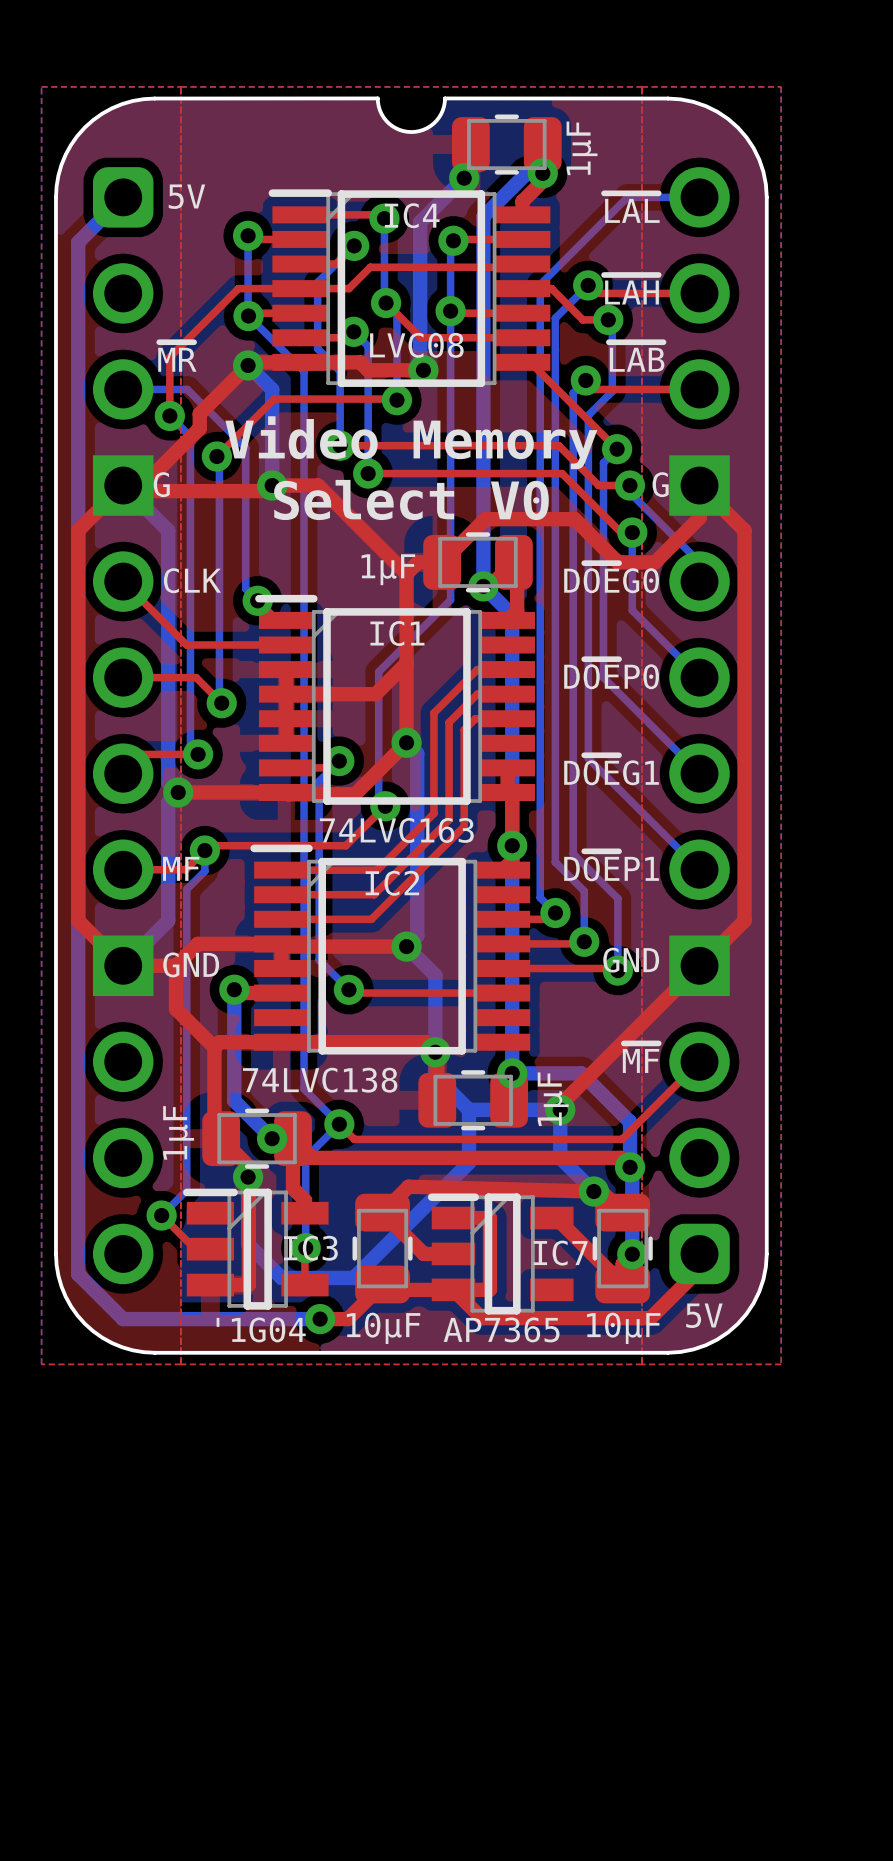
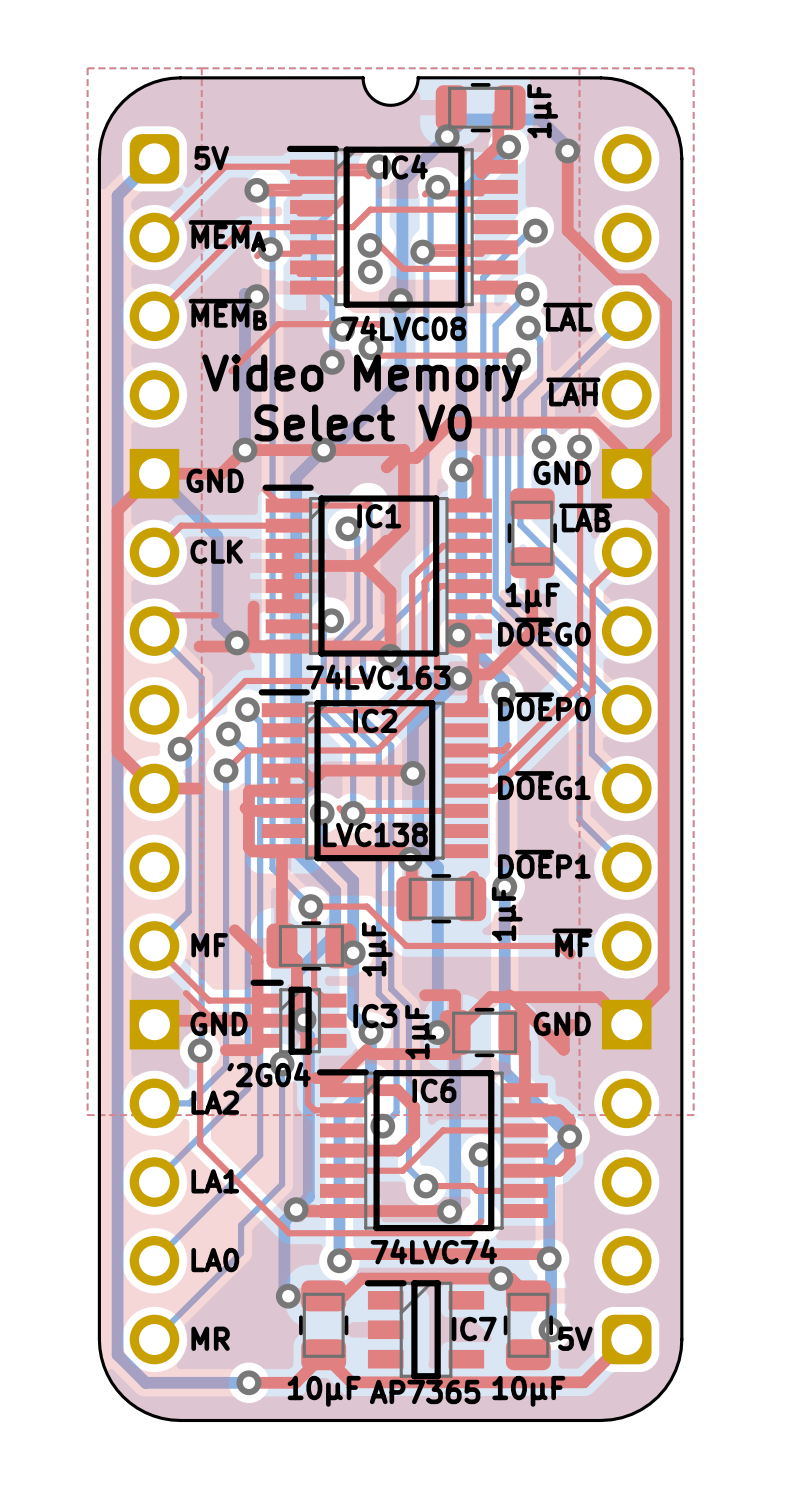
part position: (506, 144) -> (480, 107)
bottom track: (542, 173) (526, 173) (483, 216) (483, 586) (512, 615) (512, 1073) (581, 1073) (630, 1122) (632, 1254) -> none
via position: (542, 173) -> (508, 147)
bottom track: (464, 178) (420, 222) (420, 366) (423, 370) -> (288, 1296) (284, 1292) (284, 1221) (308, 1196) (308, 1035) (296, 1023) (296, 972) (335, 934) (335, 890) (296, 851) (296, 797) (312, 781) (296, 764) (296, 477) (323, 450) (331, 450) (400, 381) (400, 300)
via position: (464, 178) -> (447, 136)
bottom track: none -> (508, 147) (461, 194) (461, 632) (458, 635) (503, 680) (504, 1071) (569, 1136) (549, 1157) (551, 1329)
top track: none -> (567, 150) (567, 230) (616, 279) (642, 279) (666, 303) (666, 434) (626, 473) (663, 510)
bottom track: none -> (567, 150) (567, 147) (540, 119) (464, 119) (402, 181) (402, 294) (403, 295)
via: none -> (567, 150)
bottom track: (699, 197) (627, 197) (540, 284) (540, 897) (555, 912) -> none
top track: none -> (378, 166) (225, 166) (154, 237)
bottom track: none -> (378, 166) (378, 238) (375, 241)
text position: ~{LAL} (631, 208) -> ~{LAL} (567, 317)
bottom track: (384, 218) (384, 301) (396, 313) (396, 400) -> none
via position: (384, 218) -> (378, 166)
top track: none -> (312, 186) (268, 188)
bottom track: none -> (437, 187) (430, 194) (430, 247)
bottom track: none -> (268, 188) (272, 192) (272, 247) (270, 249) (272, 251) (272, 868) (310, 906)
bottom track: (248, 235) (248, 315) (304, 371) (304, 1089) (339, 1124) (305, 1157) (305, 1248) -> none
bottom track: (453, 240) (450, 243) (450, 599) (378, 671) (378, 799) (385, 806) -> none
via position: (453, 240) -> (437, 187)
via: (354, 245) -> none
top track: none -> (492, 209) (370, 209) (352, 227) (243, 227) (154, 316)
top track: (519, 267) (370, 267) (348, 288) (238, 288) (169, 357) (169, 415) -> none
bottom track: none -> (533, 227) (483, 277) (483, 601) (579, 698) (579, 820) (626, 867)
top track: (588, 285) (596, 293) (699, 293) -> none
bottom track: (588, 285) (555, 318) (555, 862) (584, 891) (584, 941) -> none
IC4 position: (409, 288) -> (402, 226)
top track: (522, 288) (551, 288) (582, 319) (608, 319) -> none
text: ~{LAH} (631, 289) -> none
text: none -> ~{MEM}A (227, 236)
top track: none -> (375, 241) (403, 268) (493, 268)
top track: (386, 303) (420, 337) (522, 337) -> none
top track: none -> (430, 247) (495, 247)
bottom track: none -> (422, 252) (426, 255) (426, 589) (363, 653) (363, 673) (370, 680)
via position: (248, 316) -> (270, 249)
bottom track: (608, 319) (612, 323) (612, 391) (588, 415) (588, 758) -> (518, 360) (508, 370) (508, 591) (535, 618)
via: (608, 319) -> none
bottom track: (353, 331) (368, 346) (368, 473) -> none
via: (353, 331) -> none
via: none -> (370, 272)
IC4 text: LVC08 (416, 345) -> none
text: ~{MR} (177, 357) -> ~{MEM}B (227, 314)
text position: ~{LAB} (636, 357) -> ~{LAB} (585, 517)
bottom track: none -> (245, 294) (245, 450)
top track: (530, 362) (617, 449) -> none
bottom track: none -> (527, 294) (495, 325) (495, 596) (591, 692) (591, 753) (626, 788)
via: none -> (527, 294)
bottom track: (248, 365) (272, 389) (272, 485) -> none
top track: (423, 370) (368, 370) (360, 362) (251, 362) (199, 413) (199, 428) (142, 485) -> none
top track: (585, 380) (594, 389) (699, 389) -> none
bottom track: (585, 380) (573, 393) (573, 853) (617, 898) (617, 970) -> none
via: (585, 380) -> none
bottom track: (123, 389) (187, 389) (245, 447) (245, 588) (257, 600) -> none
bottom track: none -> (626, 316) (544, 398) (544, 447)
via position: (396, 400) -> (370, 347)
via: none -> (528, 328)
IC4 text: none -> 74LVC08 (403, 328)
via: none -> (342, 329)
bottom track: (169, 415) (190, 436) (190, 746) (198, 754) -> none
via: (169, 415) -> none
top track: none -> (370, 347) (378, 355) (514, 355) (518, 360)
text position: Video Memory (411, 442) -> Video Memory (362, 378)
via: none -> (518, 360)
top track: (340, 445) (558, 445) (598, 485) (629, 485) -> none
bottom track: (617, 449) (603, 462) (603, 677) -> (528, 328) (540, 339) (540, 379) (520, 398) (520, 524) (548, 552)
via: (617, 449) -> none
bottom track: (216, 456) (219, 459) (219, 700) (221, 703) -> none
via: (216, 456) -> none
top track: (368, 473) (562, 473) (621, 532) (632, 532) -> none
via: (368, 473) -> none
text: G (161, 484) -> none
text: G (660, 484) -> ~{LAH} (573, 391)
top track: (123, 485) (78, 530) (78, 626) -> none
bottom track: (123, 485) (168, 530) (168, 782) (178, 792) (168, 802) (168, 920) (123, 965) -> none
via: (272, 485) -> none
bottom track: (629, 485) (629, 492) (699, 562) -> none
via: (629, 485) -> none
top track: (128, 491) (266, 491) (272, 485) (318, 485) (406, 573) (406, 742) (355, 794) (288, 794) (286, 792) -> (117, 510) (154, 473) (221, 473) (245, 450) (403, 450) (403, 526) (364, 565) (390, 591) (390, 656) (380, 646) (288, 646)
text position: Select V0 (411, 499) -> Select V0 (363, 422)
top track: (574, 519) (617, 562) (655, 562) (699, 517) (699, 485) (744, 530) (744, 626) -> (524, 422) (593, 422) (626, 455)
bottom track: (632, 532) (632, 610) (699, 677) -> none
via position: (632, 532) -> (579, 447)
via: none -> (544, 447)
via: none -> (245, 450)
via: none -> (323, 450)
part rotation: 0° (478, 562) -> 90° clockwise (532, 533)
part position: (478, 562) -> (532, 533)
part value position: 1μF (388, 569) -> 1μF (532, 598)
text: D~{OE}G0 (611, 578) -> GND (562, 472)
text position: CLK (192, 580) -> CLK (216, 551)
top track: (123, 581) (186, 645) -> none
bottom track: none -> (154, 473) (217, 536) (217, 623) (237, 642)
via position: (483, 586) -> (461, 469)
text: none -> GND (215, 480)
via: (257, 600) -> none
top track: none -> (368, 503) (365, 505) (288, 505)
bottom track: none -> (368, 503) (369, 626) (348, 647) (348, 703) (391, 745) (391, 988) (408, 1006) (408, 1168) (426, 1186)
bottom track: none -> (347, 528) (357, 538) (357, 621) (336, 642) (336, 708) (378, 750) (378, 993) (396, 1011) (396, 1112) (382, 1126)
via: none -> (347, 528)
top track: (477, 669) (433, 713) (433, 813) (377, 870) -> (444, 545) (412, 577) (412, 680) (382, 710) (362, 710)
text: D~{OE}P0 (611, 674) -> none
top track: (123, 677) (196, 677) (221, 703) -> (154, 552) (181, 525) (206, 525)
top track: none -> (532, 562) (532, 631) (489, 674) (463, 674) (459, 678)
top track: (477, 694) (449, 722) (449, 819) (374, 894) -> (444, 565) (440, 565) (424, 582) (424, 685) (379, 730) (360, 730)
via: (221, 703) -> none
top track: (475, 718) (464, 730) (464, 826) (371, 919) -> (443, 586) (436, 589) (436, 690) (377, 750) (357, 750)
part: (411, 725) -> none
bottom track: (406, 742) (417, 753) (417, 935) (406, 946) (435, 975) (435, 1076) (469, 1109) (560, 1109) (560, 1157) (593, 1191) -> none
via: (406, 742) -> none
top track: none -> (253, 606) (253, 646)
via: (198, 754) -> none
bottom track: none -> (329, 617) (323, 623) (323, 713) (353, 743) (353, 813)
bottom track: (339, 761) (319, 781) (319, 960) (348, 989) -> none
text position: D~{OE}G1 (611, 770) -> D~{OE}G1 (544, 785)
bottom track: none -> (154, 631) (201, 678) (201, 1049) (200, 1050)
text: none -> D~{OE}G0 (544, 632)
via: none -> (458, 635)
via: none -> (237, 642)
via: (178, 792) -> none
bottom track: none -> (390, 656) (412, 678) (459, 678) (412, 725) (412, 773) (418, 778) (418, 847) (437, 867) (437, 906)
top track: (385, 806) (345, 845) (209, 845) (185, 869) (123, 869) -> none
via position: (385, 806) -> (390, 656)
top track: none -> (370, 680) (245, 680) (180, 746) (180, 749)
via position: (512, 845) -> (459, 678)
bottom track: (204, 850) (204, 871) (186, 889) (186, 1190) (161, 1215) -> none
via: (204, 850) -> none
via: none -> (503, 693)
text: D~{OE}P1 (611, 866) -> D~{OE}P0 (544, 706)
text position: MF (181, 868) -> MF (209, 945)
bottom track: none -> (247, 709) (260, 722) (260, 1155) (154, 1260)
via: none -> (247, 709)
bottom track: none -> (228, 734) (247, 753) (247, 1088) (154, 1182)
via: none -> (228, 734)
via: (555, 912) -> none
bottom track: none -> (180, 749) (188, 757) (188, 911) (154, 945)
via: none -> (180, 749)
part: none -> (390, 749)
top track: none -> (284, 750) (246, 750) (226, 770)
top track: (744, 920) (560, 1105) (560, 1109) -> (663, 751) (663, 987) (626, 1024) (599, 997) (490, 997) (455, 1032) (437, 1032)
top track: (584, 941) (582, 943) (537, 943) -> (579, 447) (580, 684) (494, 770)
via: (584, 941) -> none
top track: none -> (284, 770) (301, 770) (312, 781) (323, 770) (410, 770) (412, 773)
bottom track: none -> (226, 770) (226, 1066) (189, 1103) (154, 1103)
via: none -> (226, 770)
top track: (406, 946) (284, 946) (281, 943) (197, 943) (176, 965) (176, 1009) (214, 1047) -> none
via: (406, 946) -> none
via: none -> (412, 773)
text: GND (631, 960) -> none
text: GND (191, 964) -> none
top track: (537, 968) (615, 968) (617, 970) -> (494, 790) (592, 692) (592, 586) (626, 552)
via: (617, 970) -> none
bottom track: (234, 989) (234, 1100) (272, 1138) -> none
via: (234, 989) -> none
via: (348, 989) -> none
bottom track: none -> (322, 813) (322, 849) (353, 880) (353, 1014) (370, 1032) (370, 1083) (339, 1115) (339, 1260)
via: none -> (322, 813)
via: none -> (353, 813)
IC2 text: none -> LVC138 (375, 835)
top track: (242, 1042) (219, 1042) (214, 1047) -> (252, 851) (248, 847) (248, 791) (284, 790)
top track: none -> (284, 851) (281, 853) (281, 945) (296, 960) (296, 1023) (293, 1020) (158, 1020)
top track: (214, 1047) (214, 1132) -> none
text: ~{MF} (641, 1058) -> D~{OE}P1 (544, 864)
top track: (699, 1061) (622, 1139) (354, 1139) (339, 1124) -> none
via: (512, 1073) -> none
IC2 text: 74LVC138 (320, 1080) -> none
part value position: 1μF (553, 1099) -> 1μF (507, 914)
via position: (560, 1109) -> (504, 886)
via position: (339, 1124) -> (310, 906)
part value position: 1μF (178, 1132) -> 1μF (377, 949)
part position: (257, 1138) -> (311, 945)
via: (272, 1138) -> none
top track: (293, 1138) (312, 1157) (430, 1157) -> (326, 1000) (314, 988) (314, 910) (310, 906) (367, 906) (406, 945)
top track: (293, 1138) (293, 1188) (304, 1200) (304, 1213) -> none
text: none -> ~{MF} (572, 942)
top track: none -> (154, 945) (209, 1000) (267, 1000)
top track width: thick (430, 1157) (620, 1157) -> thin (406, 945) (562, 945)
bottom track: (469, 1162) (353, 1277) (281, 1277) (248, 1244) (248, 1177) -> (437, 949) (437, 1032) (455, 1049) (455, 1206) (449, 1211)
via: none -> (353, 952)
via: (630, 1167) -> none
via: (248, 1177) -> none
IC3 footprint: [183, 1188, 329, 1310] -> [250, 979, 347, 1055]
via: (593, 1191) -> none
top track: (622, 1212) (596, 1186) (593, 1191) (408, 1186) (382, 1212) (423, 1253) (453, 1253) -> none
via: (161, 1215) -> none
part: 10µF (382, 1248) -> none
part: 10µF (622, 1248) -> none
text: none -> GND (219, 1023)
IC7 position: (500, 1253) -> (424, 1329)
text: none -> GND (562, 1023)
via: (632, 1254) -> none
via: none -> (370, 1032)
via: none -> (437, 1032)
part: none -> 1μF (484, 1032)
top track: (699, 1269) (650, 1318) (481, 1318) (453, 1289) -> none
top track: none -> (521, 1039) (524, 1043) (524, 1110) (559, 1110) (569, 1120) (569, 1160) (559, 1170) (524, 1170)
top track: none -> (333, 1040) (315, 1040) (307, 1048) (307, 1103) (314, 1110) (342, 1110)
bottom track: (78, 1274) (123, 1319) (320, 1319) -> (117, 1041) (117, 1354) (145, 1382) (248, 1382)
top track: none -> (200, 1050) (200, 1144) (289, 1233) (469, 1233) (481, 1221)
via: none -> (200, 1050)
bottom track: none -> (282, 1064) (282, 1184) (241, 1225) (241, 1252) (154, 1339)
via: none -> (282, 1064)
text position: 5V (704, 1315) -> 5V (575, 1338)
via: (320, 1319) -> none
top track: none -> (342, 1090) (364, 1090) (370, 1083) (377, 1090) (397, 1090) (414, 1107) (414, 1134) (398, 1150) (342, 1150)
text: none -> LA2 (215, 1102)
via: none -> (382, 1126)
top track: none -> (524, 1130) (443, 1130) (402, 1170) (342, 1170)
via: none -> (569, 1136)
IC6: none -> (432, 1150)
bottom track: none -> (481, 1154) (481, 1221)
via: none -> (481, 1154)
text: none -> LA1 (215, 1181)
top track: none -> (426, 1186) (472, 1186) (477, 1190) (524, 1190)
via: none -> (426, 1186)
top track: none -> (296, 1209) (449, 1211)
via: none -> (296, 1209)
via: none -> (449, 1211)
top track: none -> (549, 1258) (544, 1254) (346, 1254) (339, 1260)
via: none -> (549, 1258)
text: none -> LA0 (215, 1260)
via: none -> (339, 1260)
via: none -> (500, 1278)
top track: none -> (337, 1295) (343, 1295) (361, 1278) (511, 1278) (528, 1295)
via: none -> (288, 1296)
part: none -> 10µF (323, 1325)
part: none -> 10µF (528, 1325)
via: none -> (551, 1329)
text: none -> MR (210, 1338)
top track: none -> (626, 1339) (583, 1382) (351, 1382) (323, 1354) (295, 1382) (248, 1382)
via: none -> (248, 1382)

